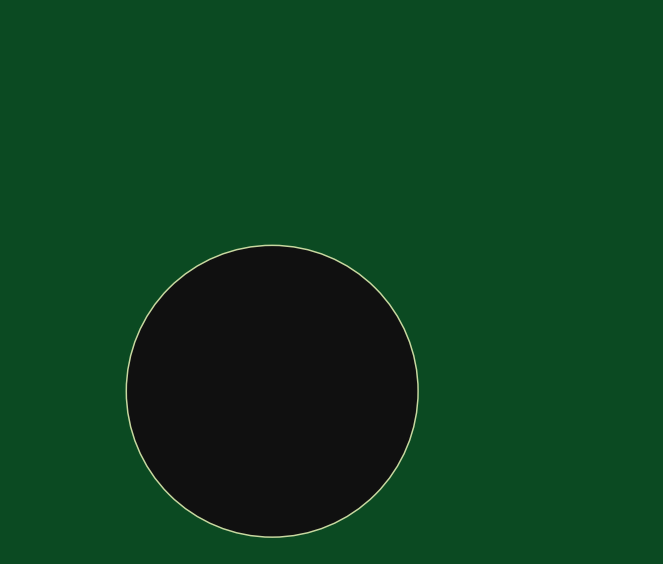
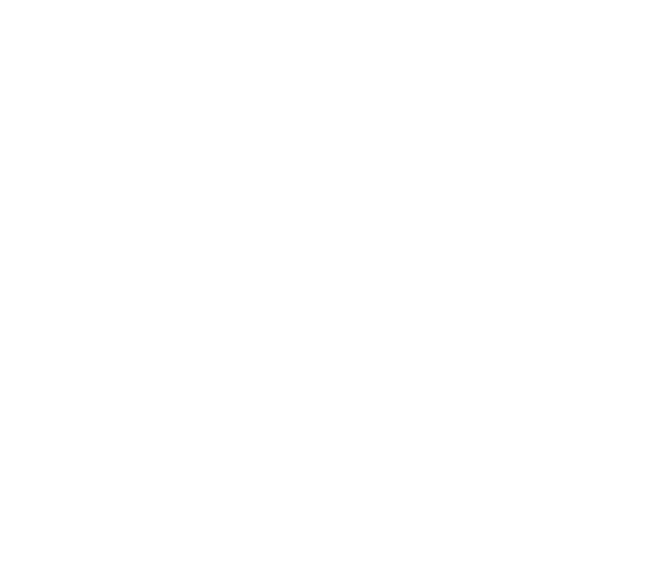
part: (272, 391) -> none

